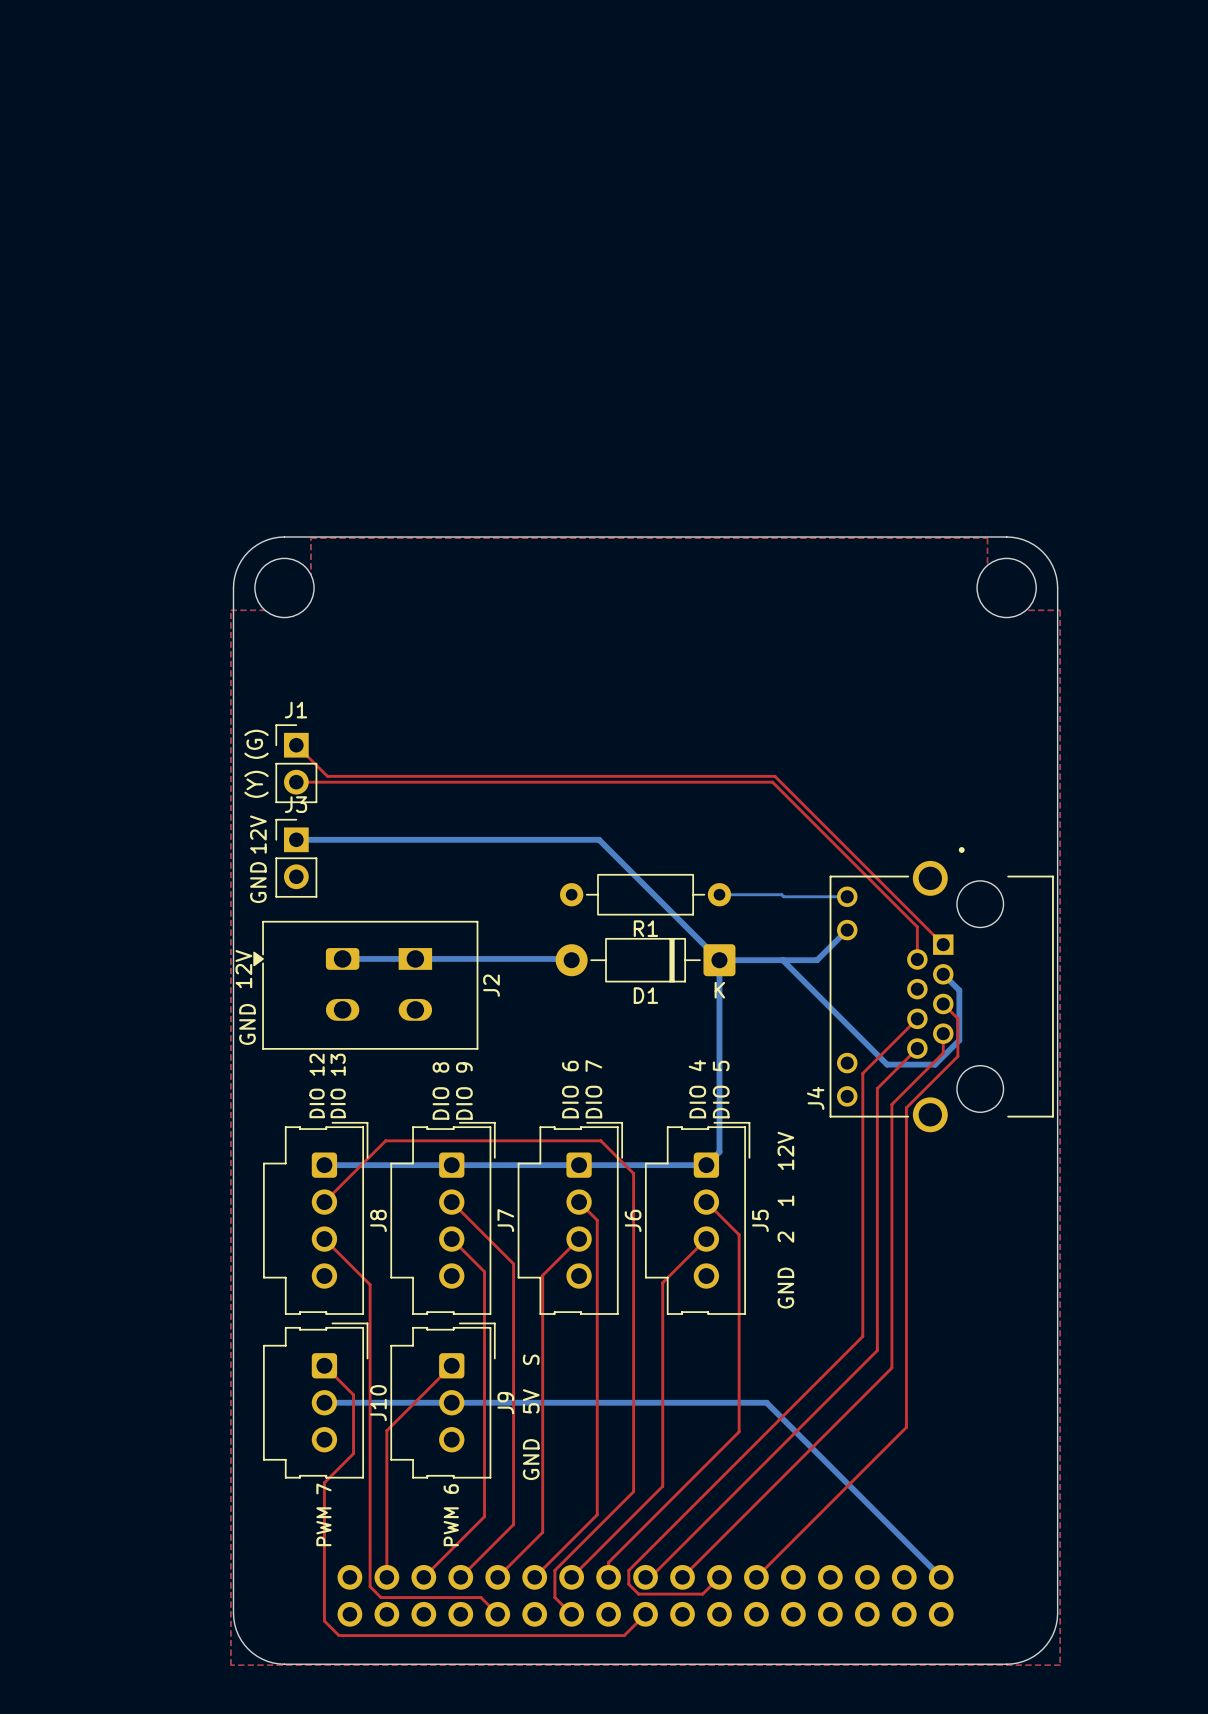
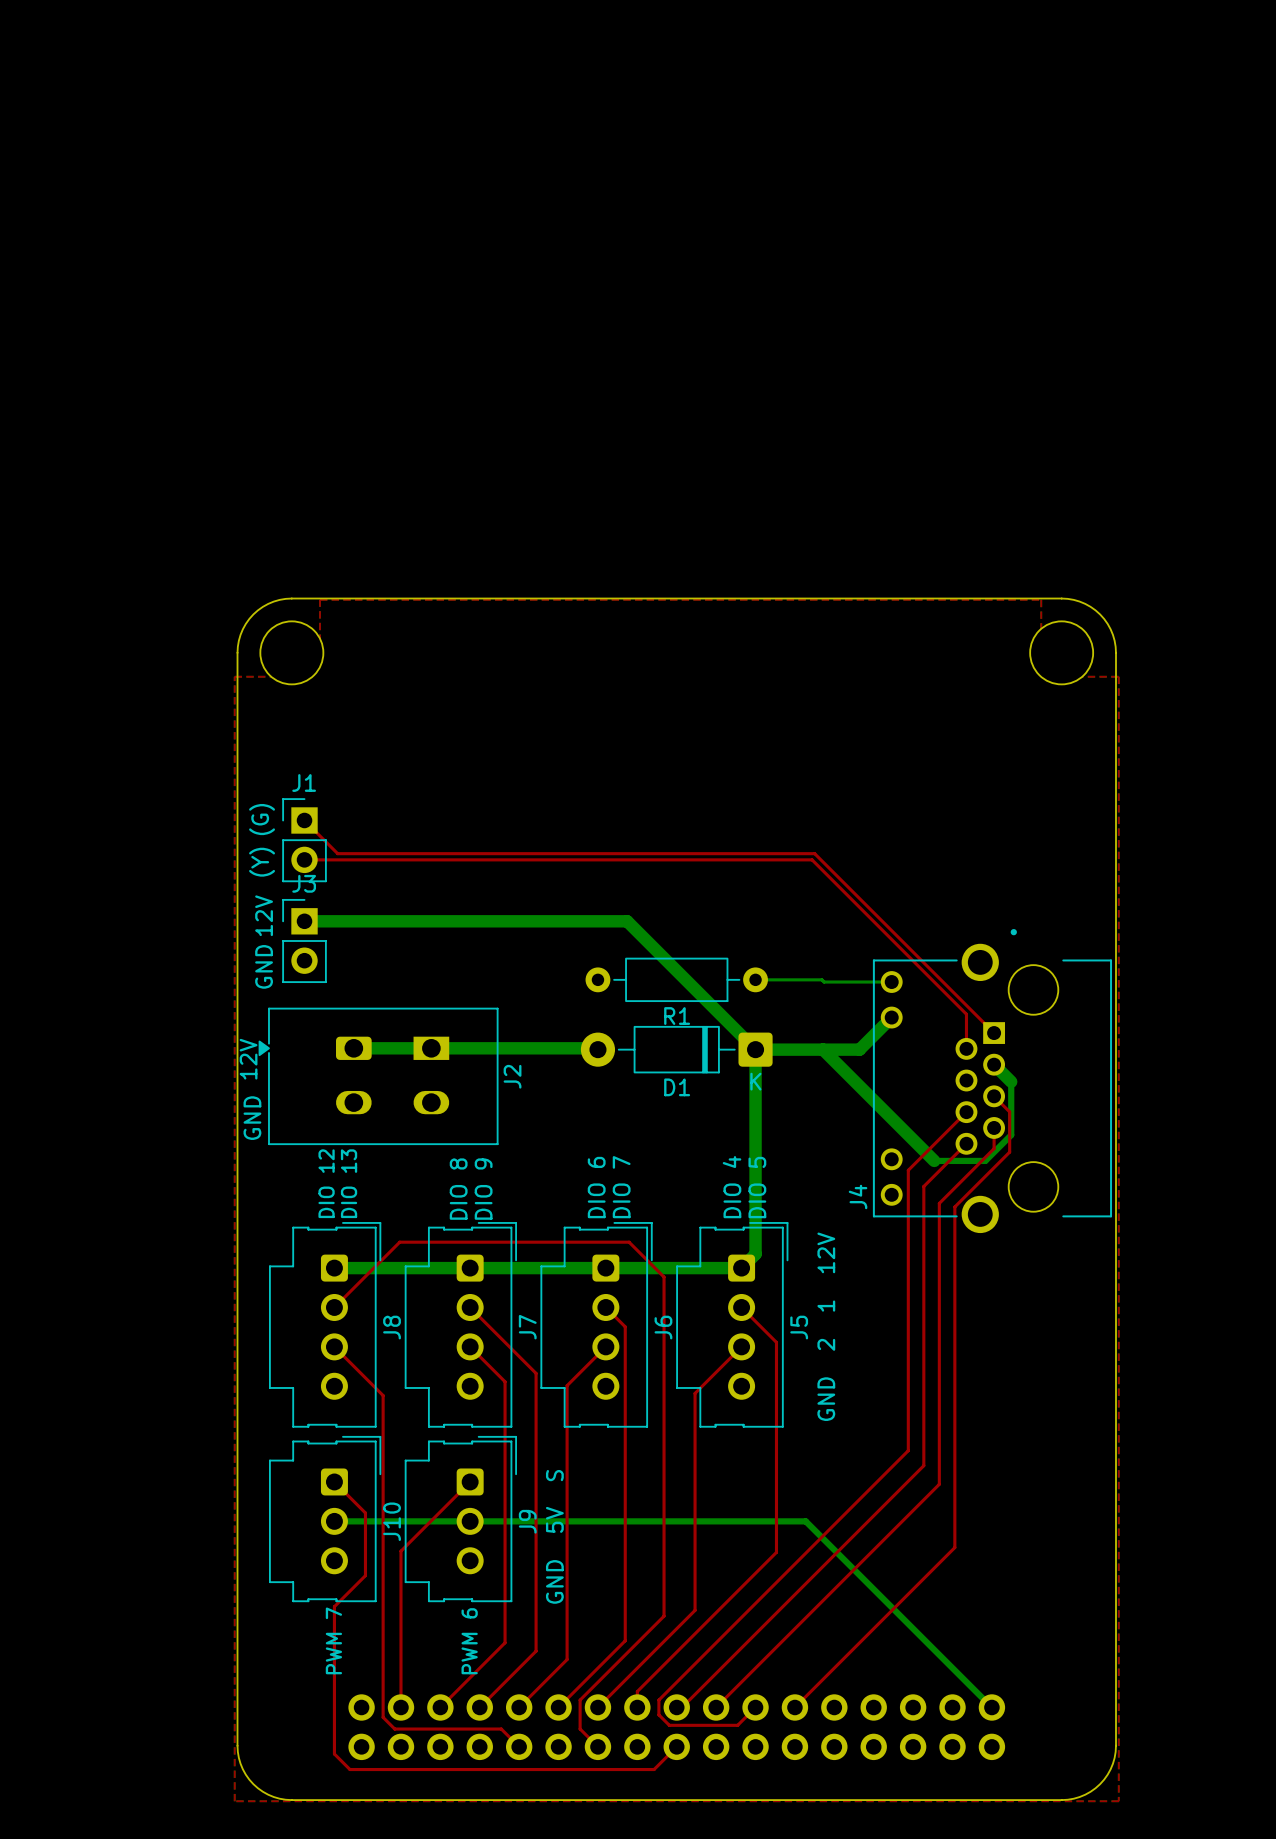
bottom track width: thin (296, 839) (599, 839) (719, 960) -> thick (304, 921) (627, 921) (755, 1049)
bottom track width: thin (847, 930) (817, 960) (719, 960) -> thick (891, 1017) (859, 1049) (755, 1049)
bottom track width: thin (342, 958) (570, 958) -> thick (353, 1048) (596, 1048)
bottom track width: thin (719, 960) (719, 1152) (706, 1165) (324, 1165) -> thick (755, 1049) (755, 1254) (741, 1268) (334, 1268)
bottom track width: thin (782, 960) (887, 1064) -> thick (823, 1049) (934, 1160)
bottom track width: thin (943, 974) (959, 990) -> thick (994, 1064) (1011, 1081)

